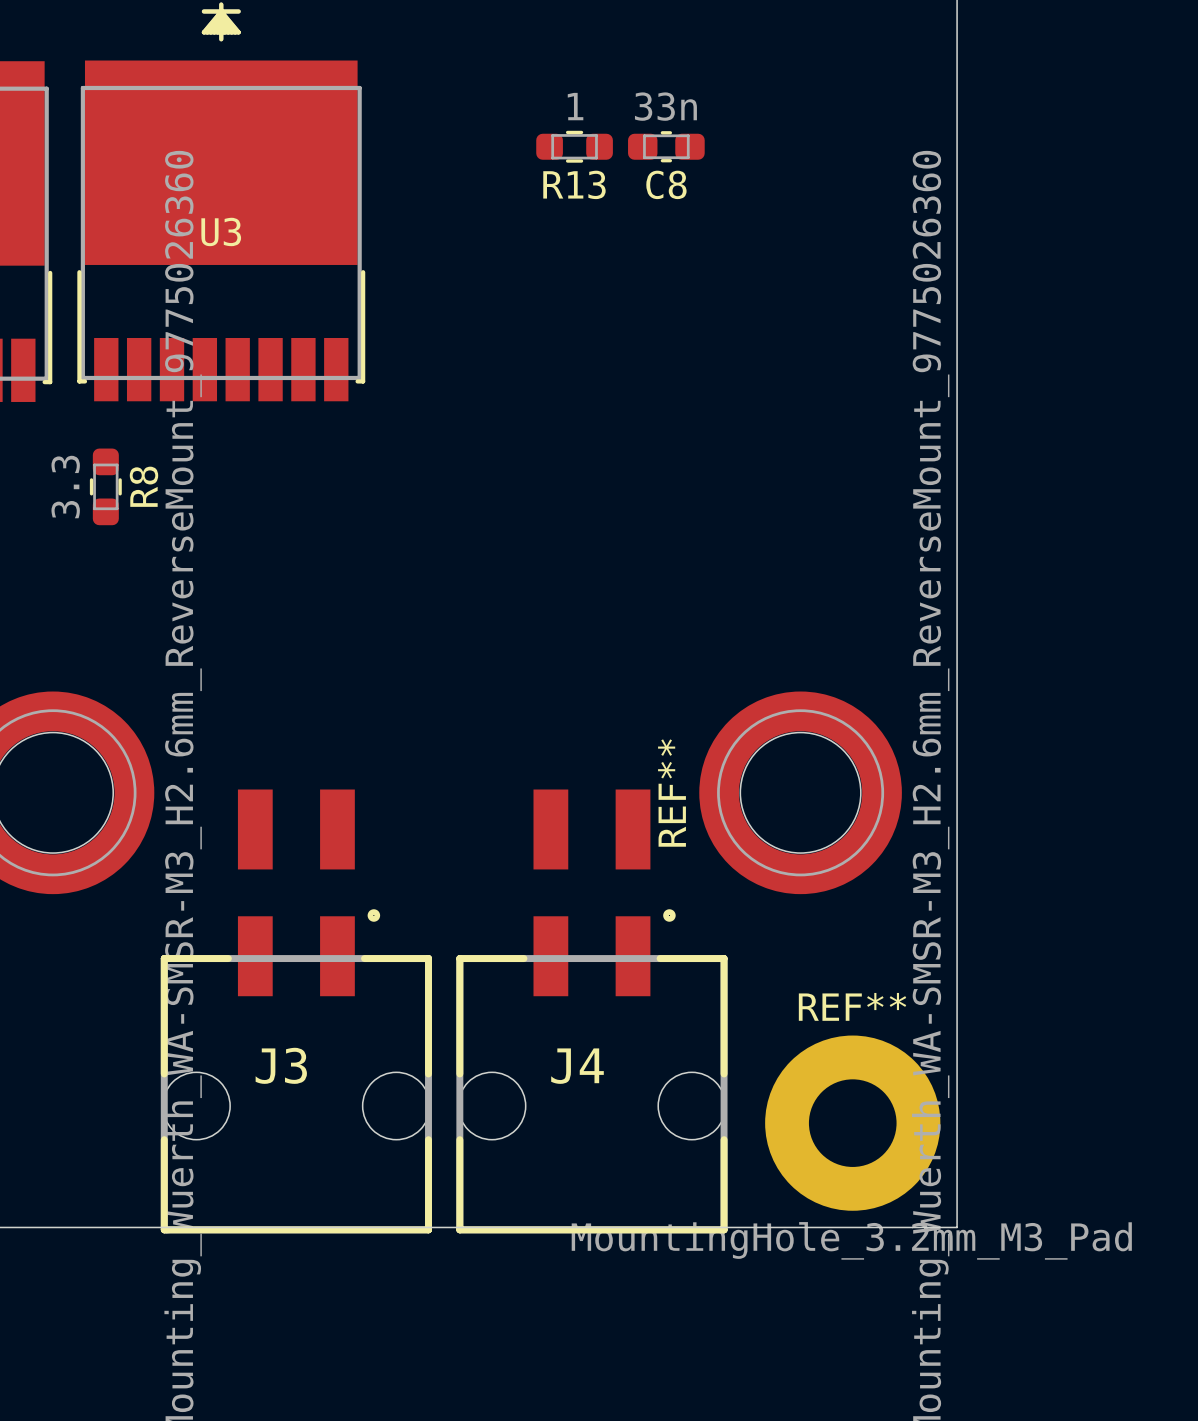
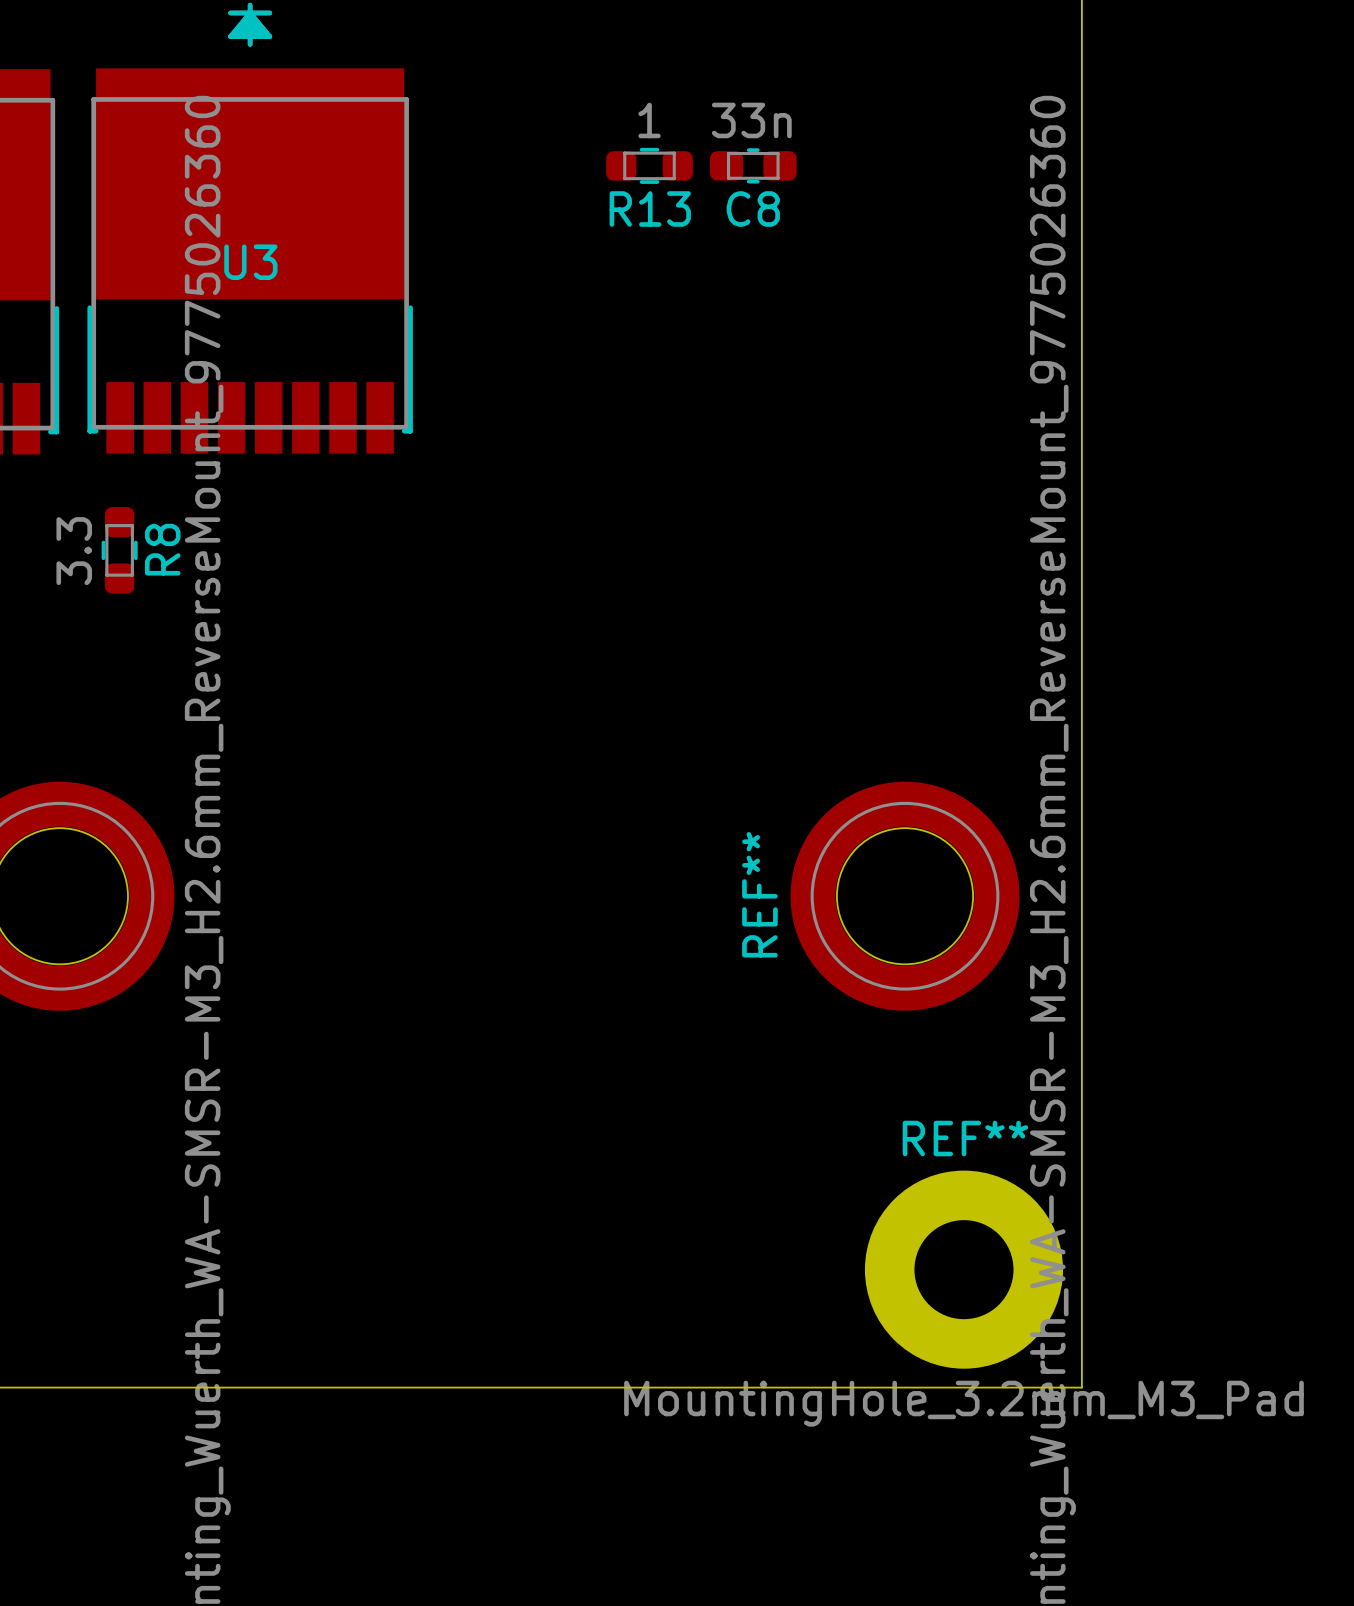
J3: (296, 1011) -> none
J4: (591, 1011) -> none

